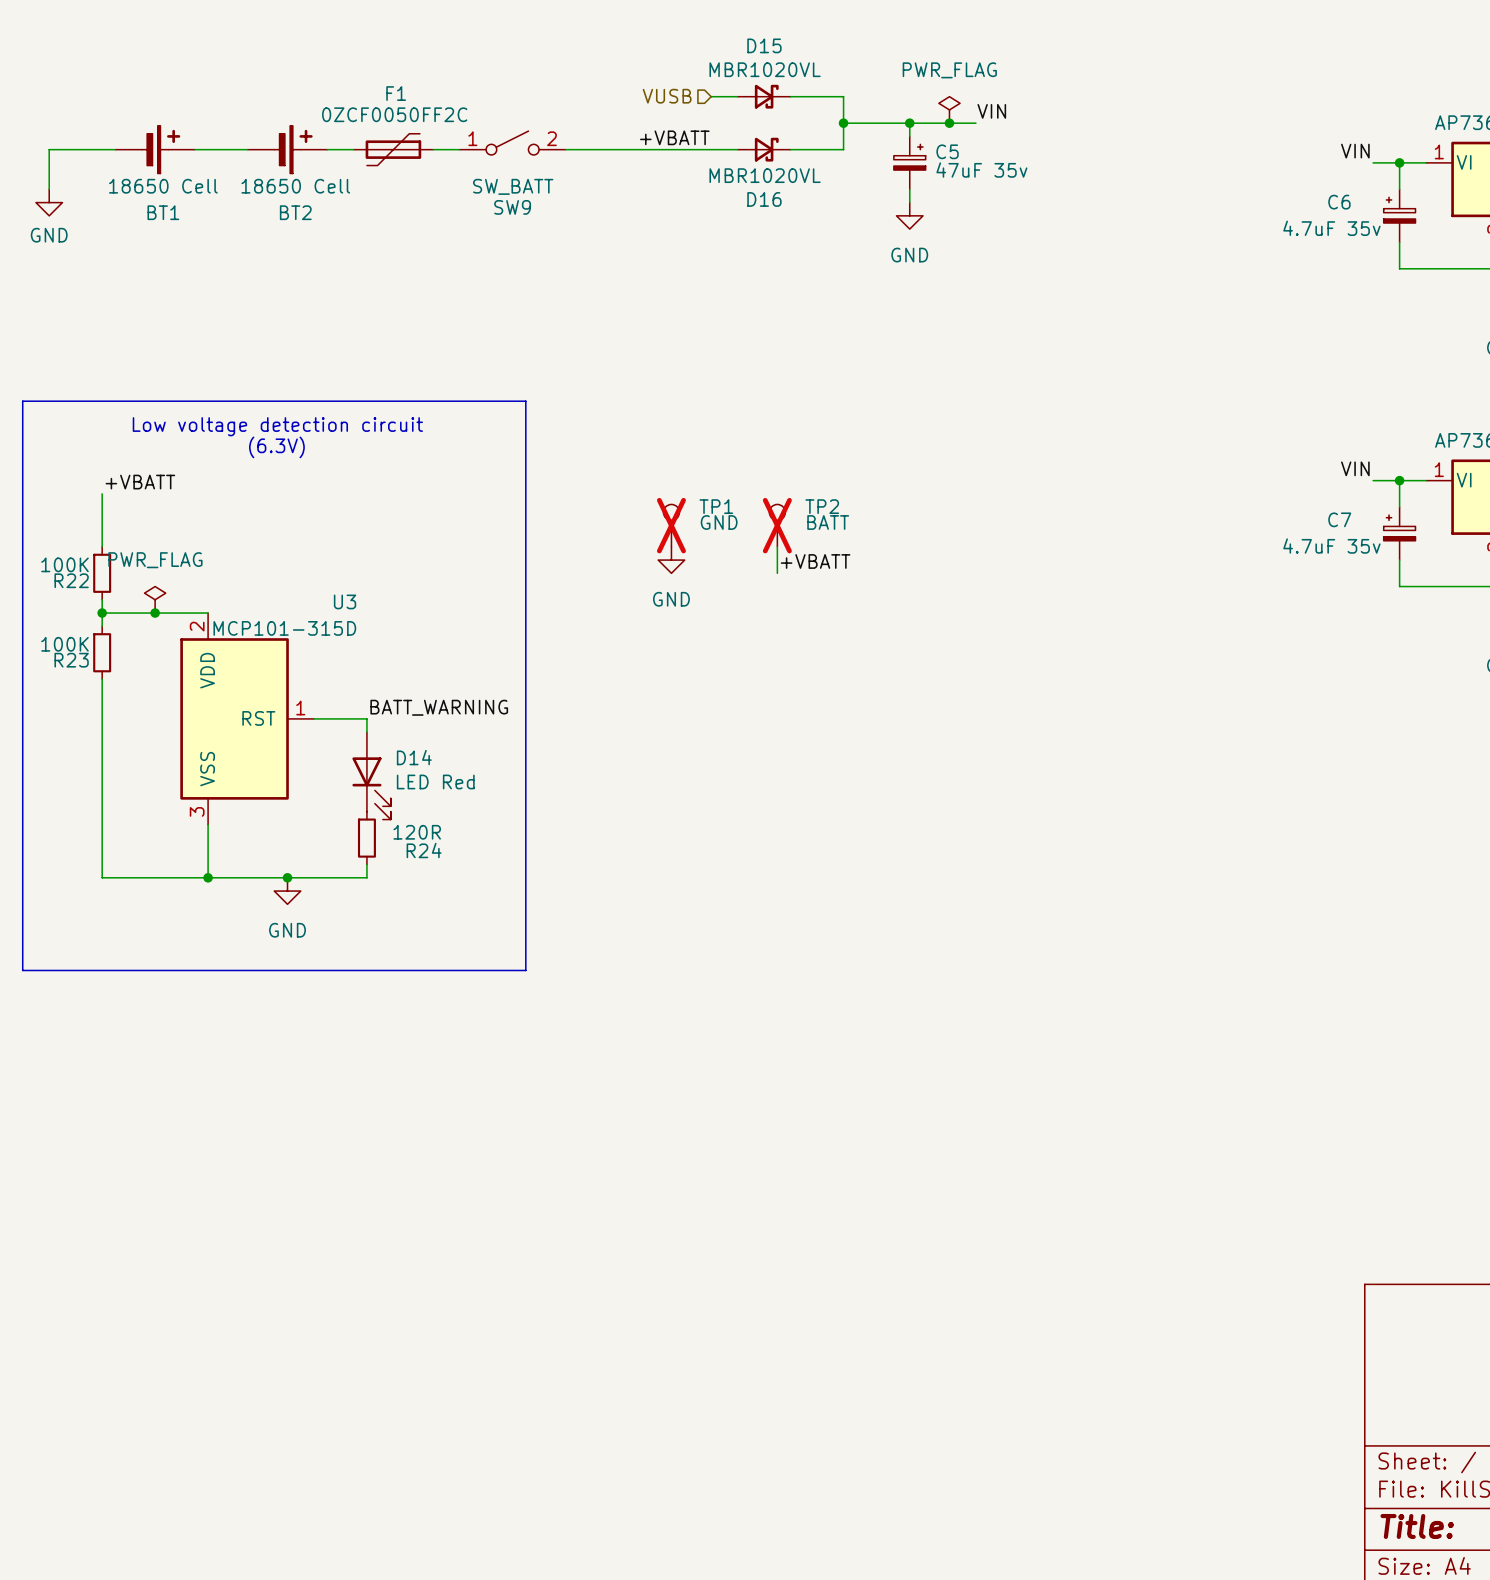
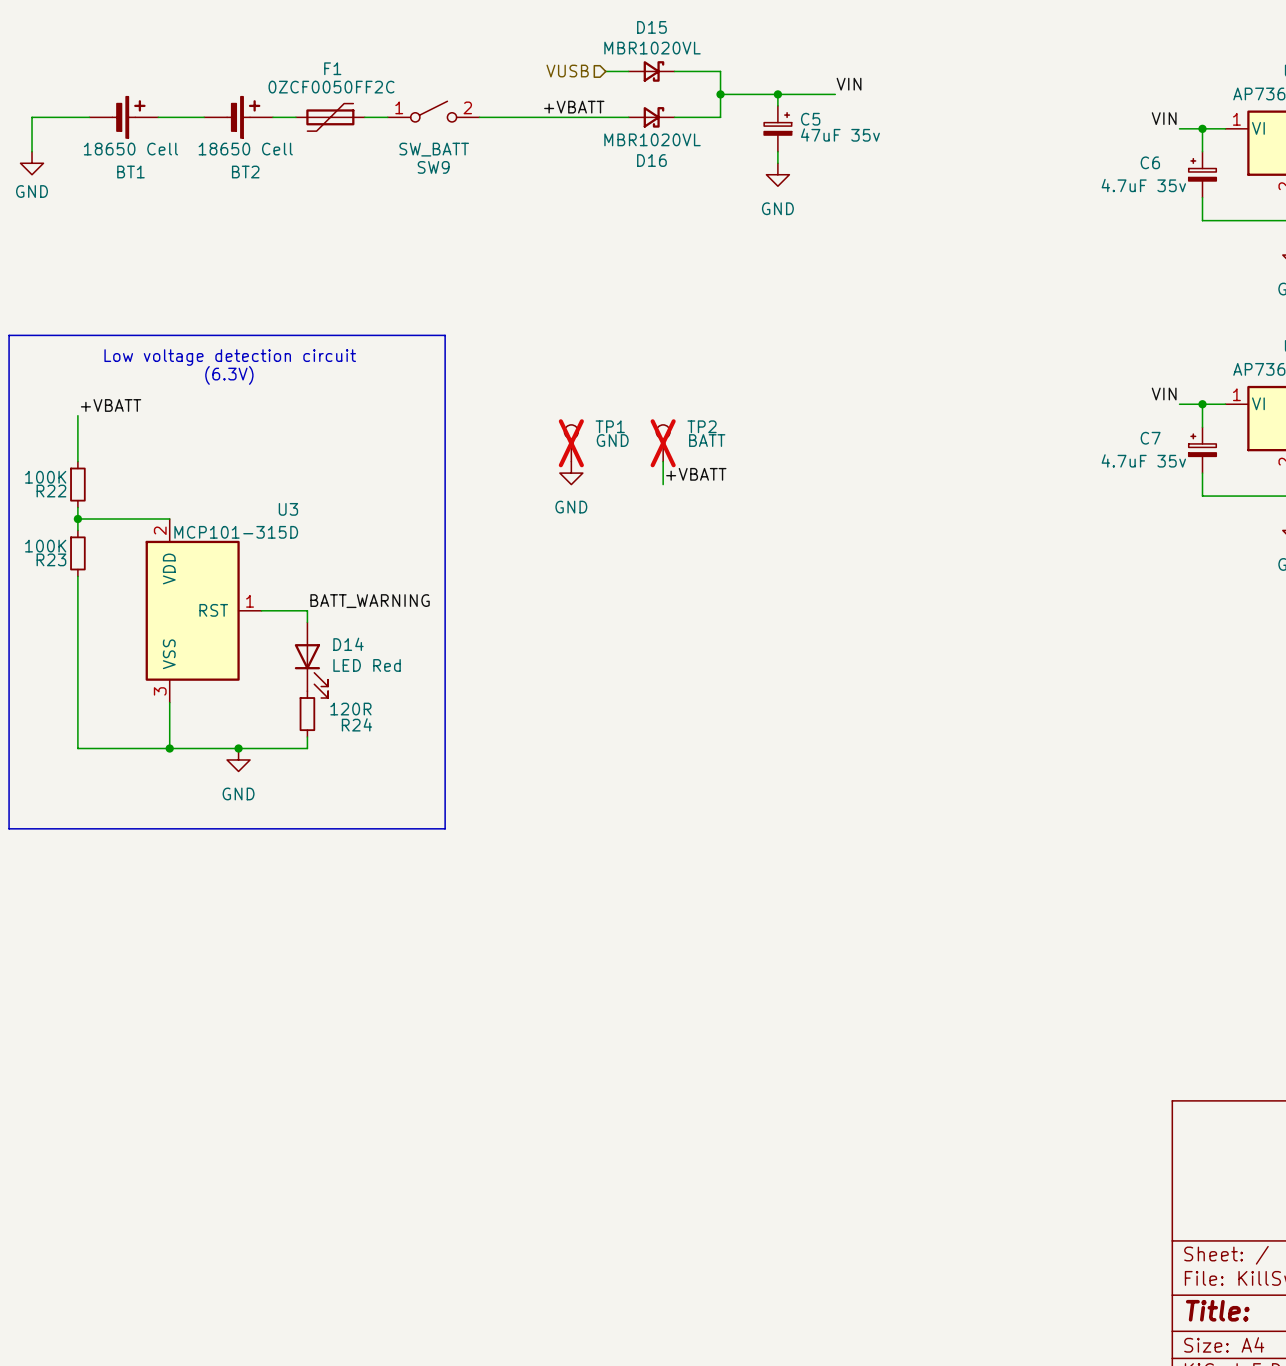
power symbol: PWR_FLAG (949, 109) -> none
junction: (949, 123) -> none
power symbol: PWR_FLAG (155, 599) -> none
junction: (155, 613) -> none

